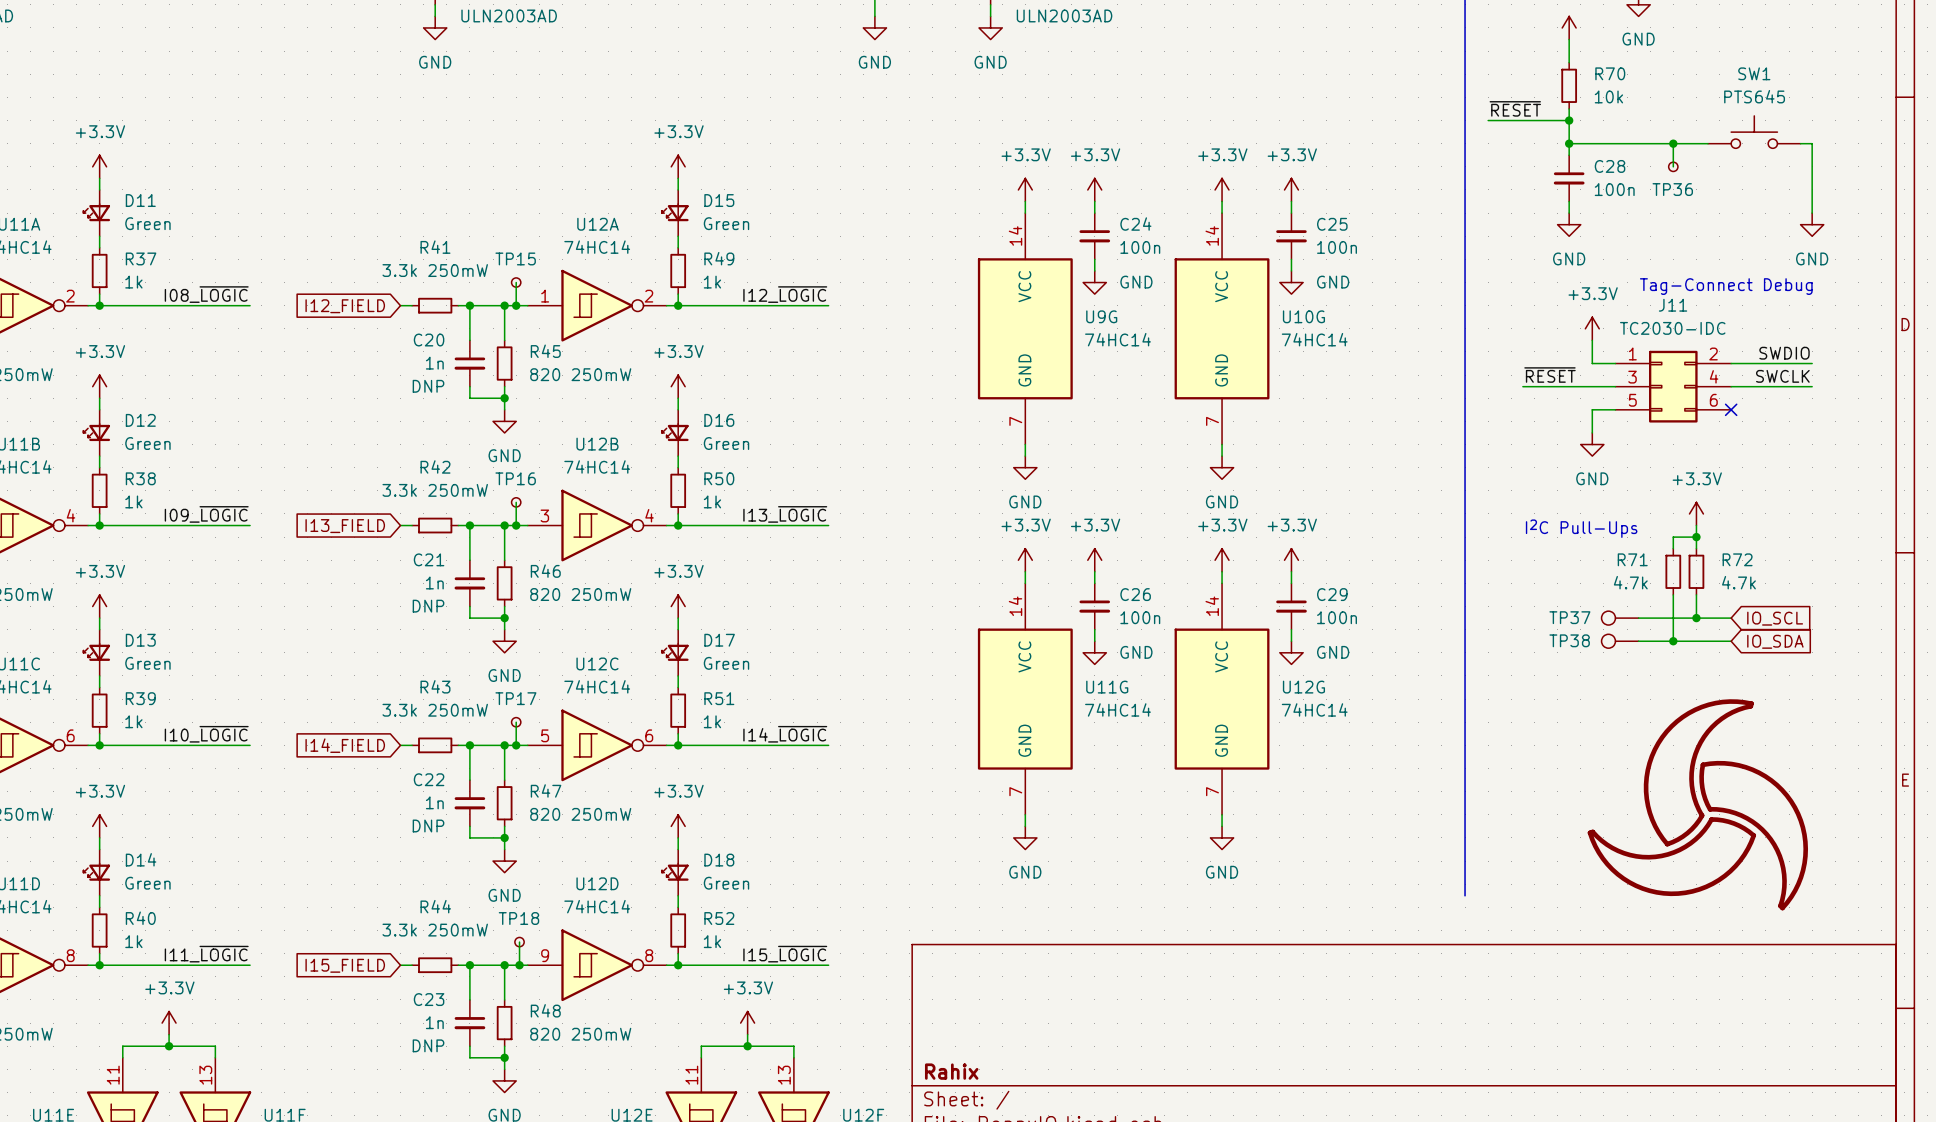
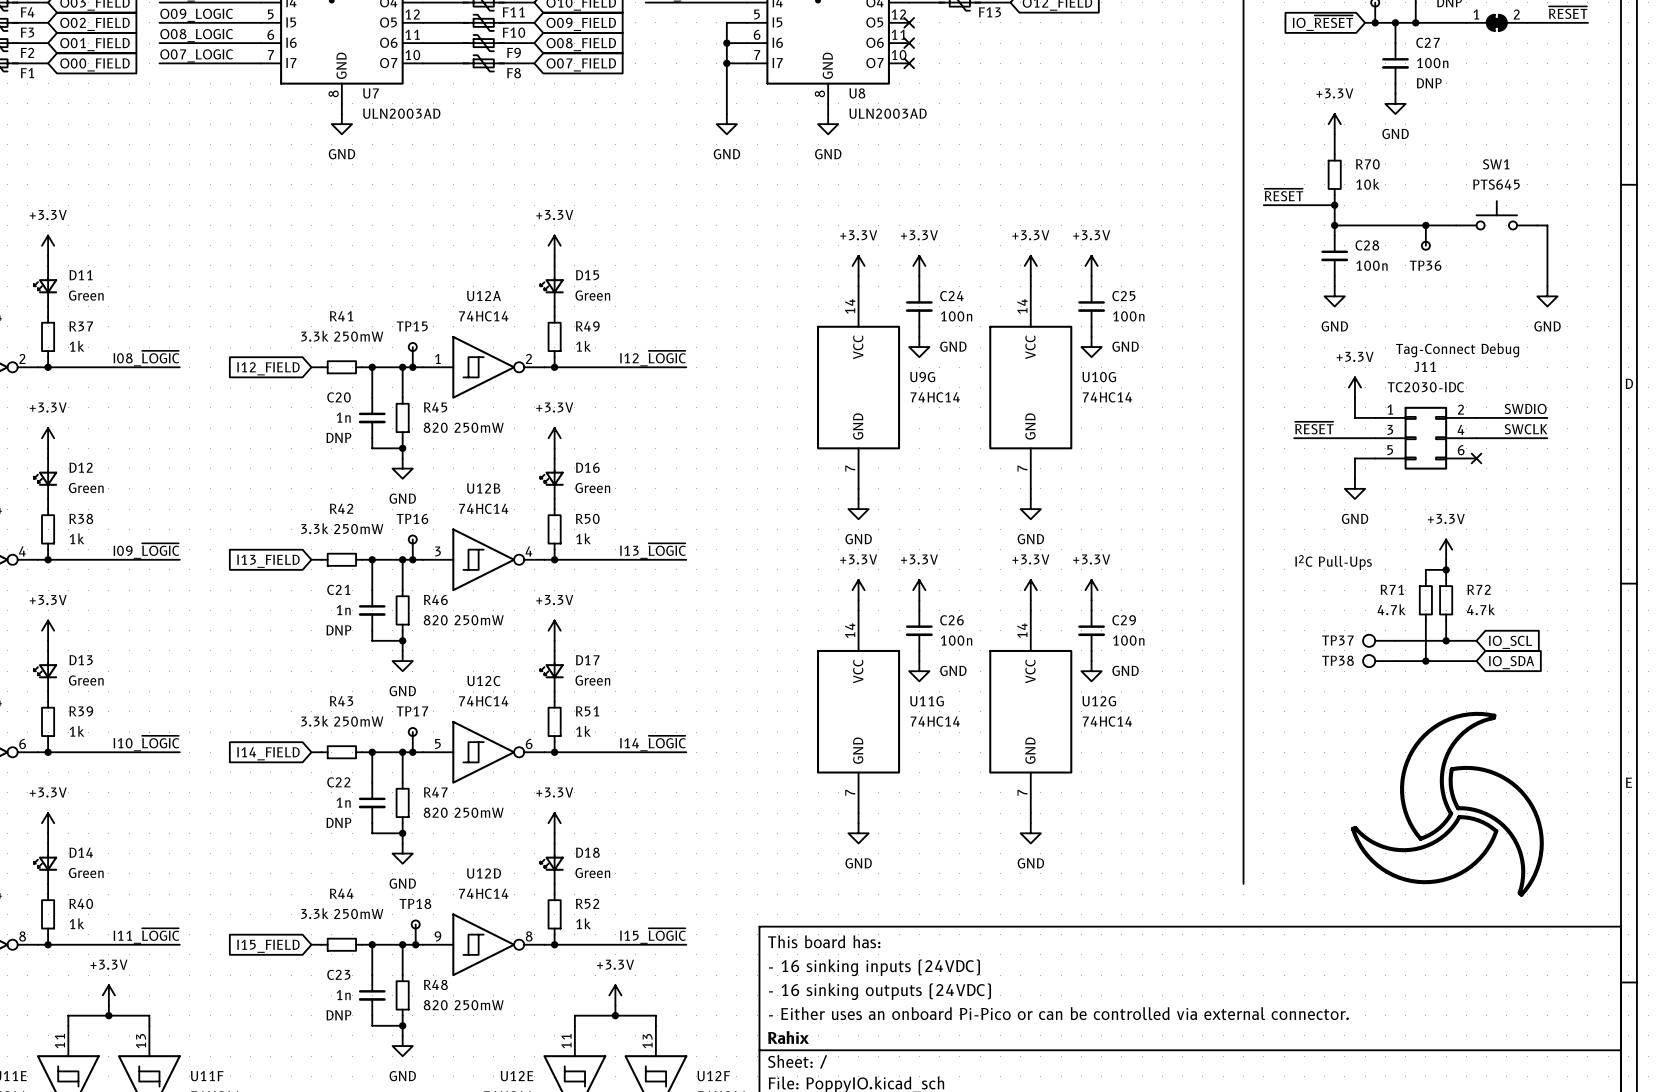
title block: none -> This board has: (824, 941)
title block: none -> - 16 sinking inputs (24VDC) (874, 967)
title block: none -> - 16 sinking outputs (24VDC) (880, 991)
title block: none -> - Either uses an onboard Pi-Pico or can be controlled via external connector. (1058, 1013)

